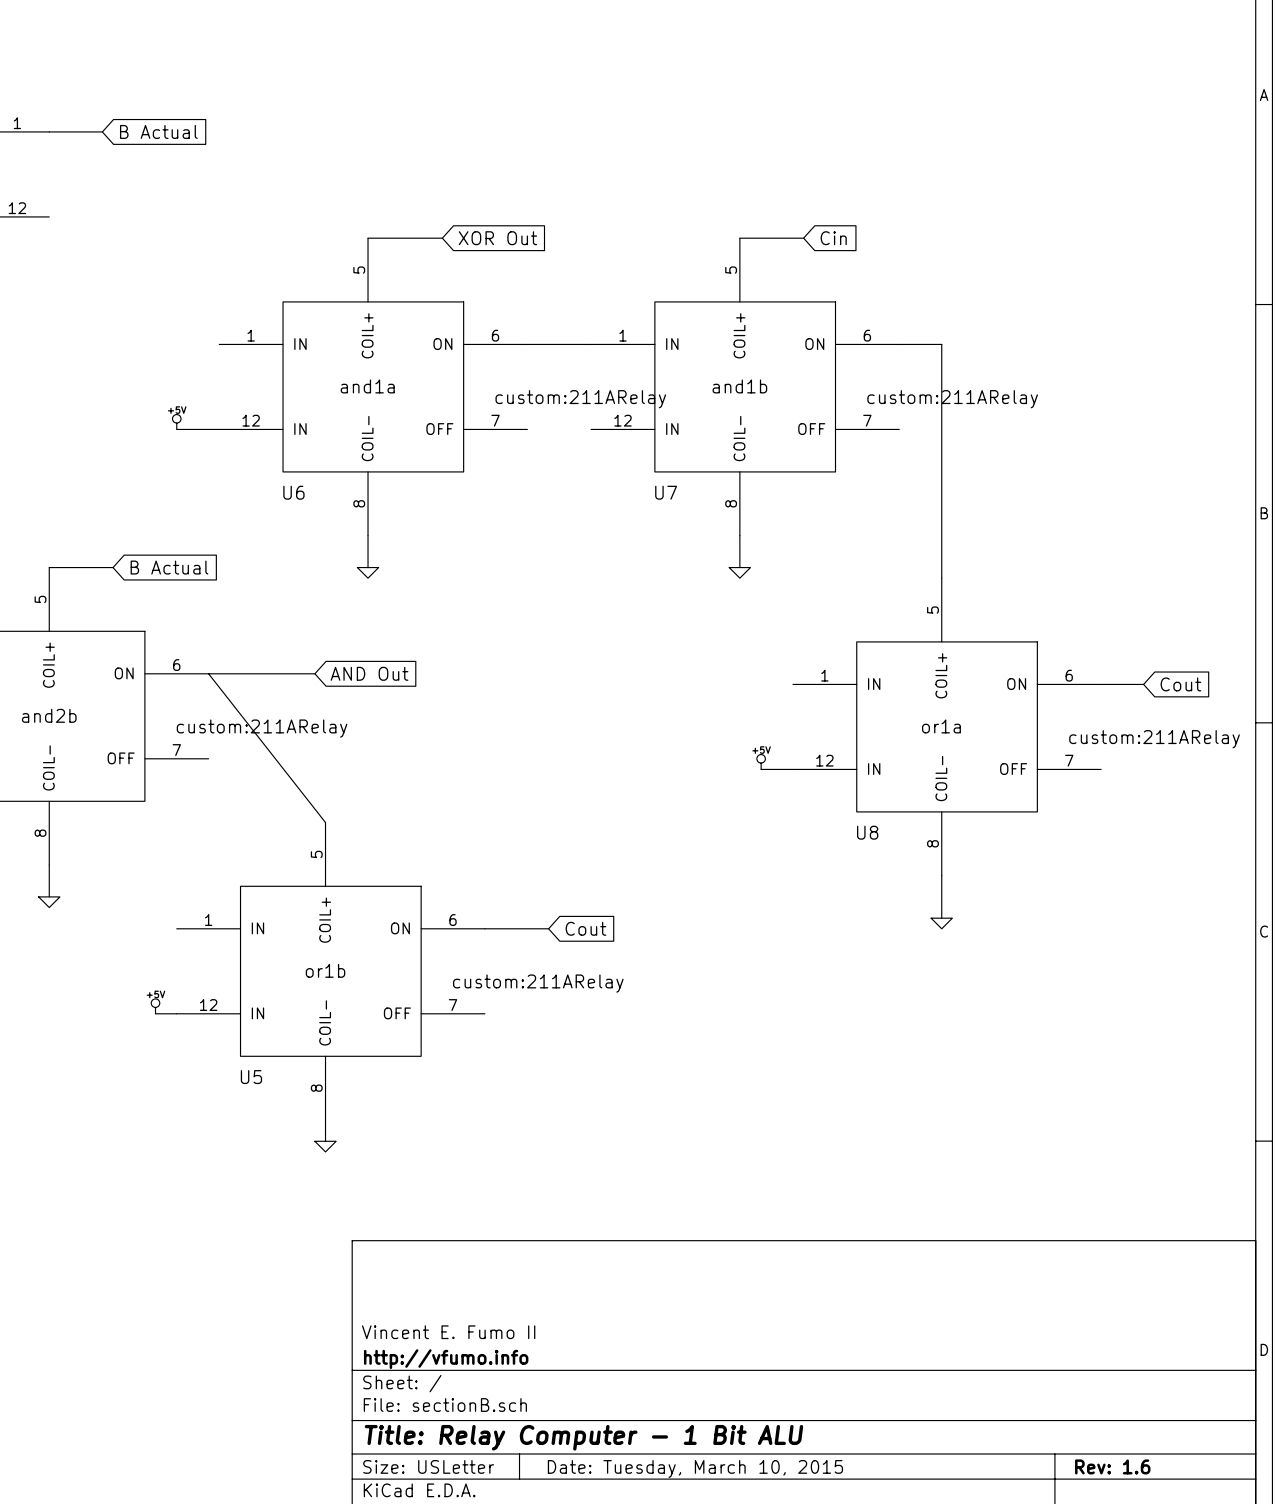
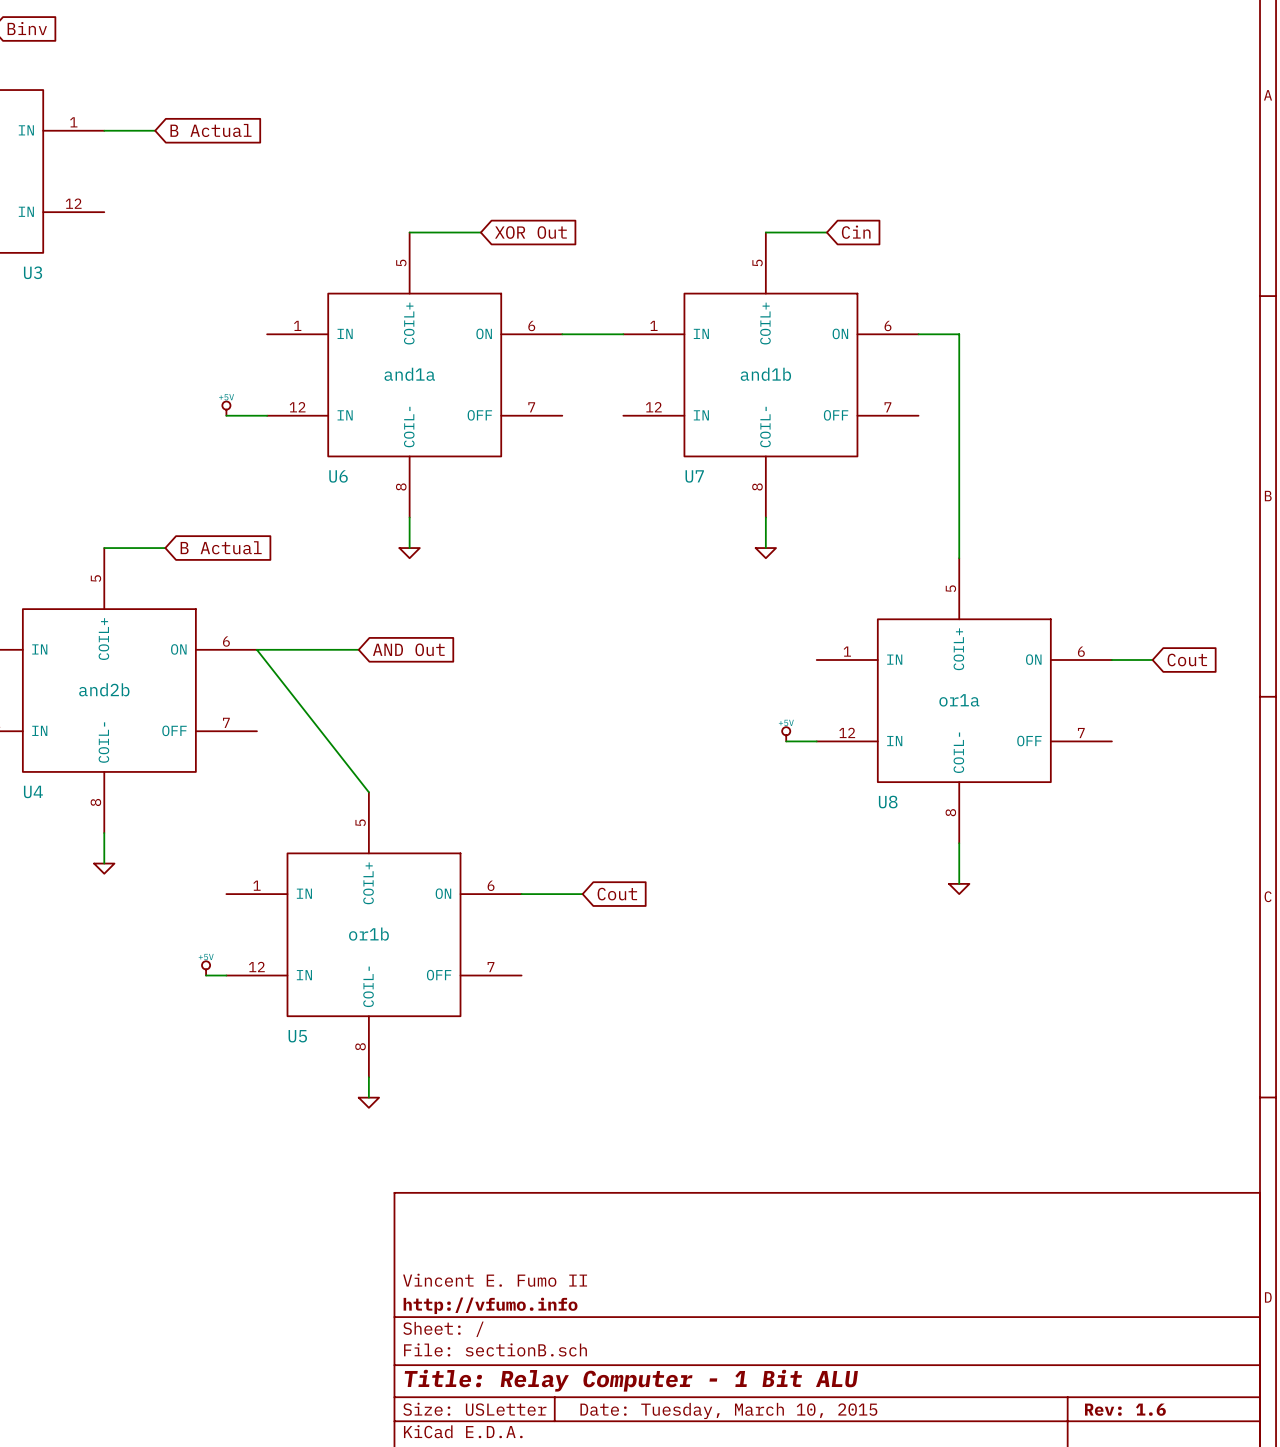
U6 text: custom:211ARelay (580, 399) -> none
U7 text: custom:211ARelay (952, 399) -> none
U4 text: custom:211ARelay (262, 728) -> none
U8 text: custom:211ARelay (1154, 739) -> none
U5 text: custom:211ARelay (538, 983) -> none

